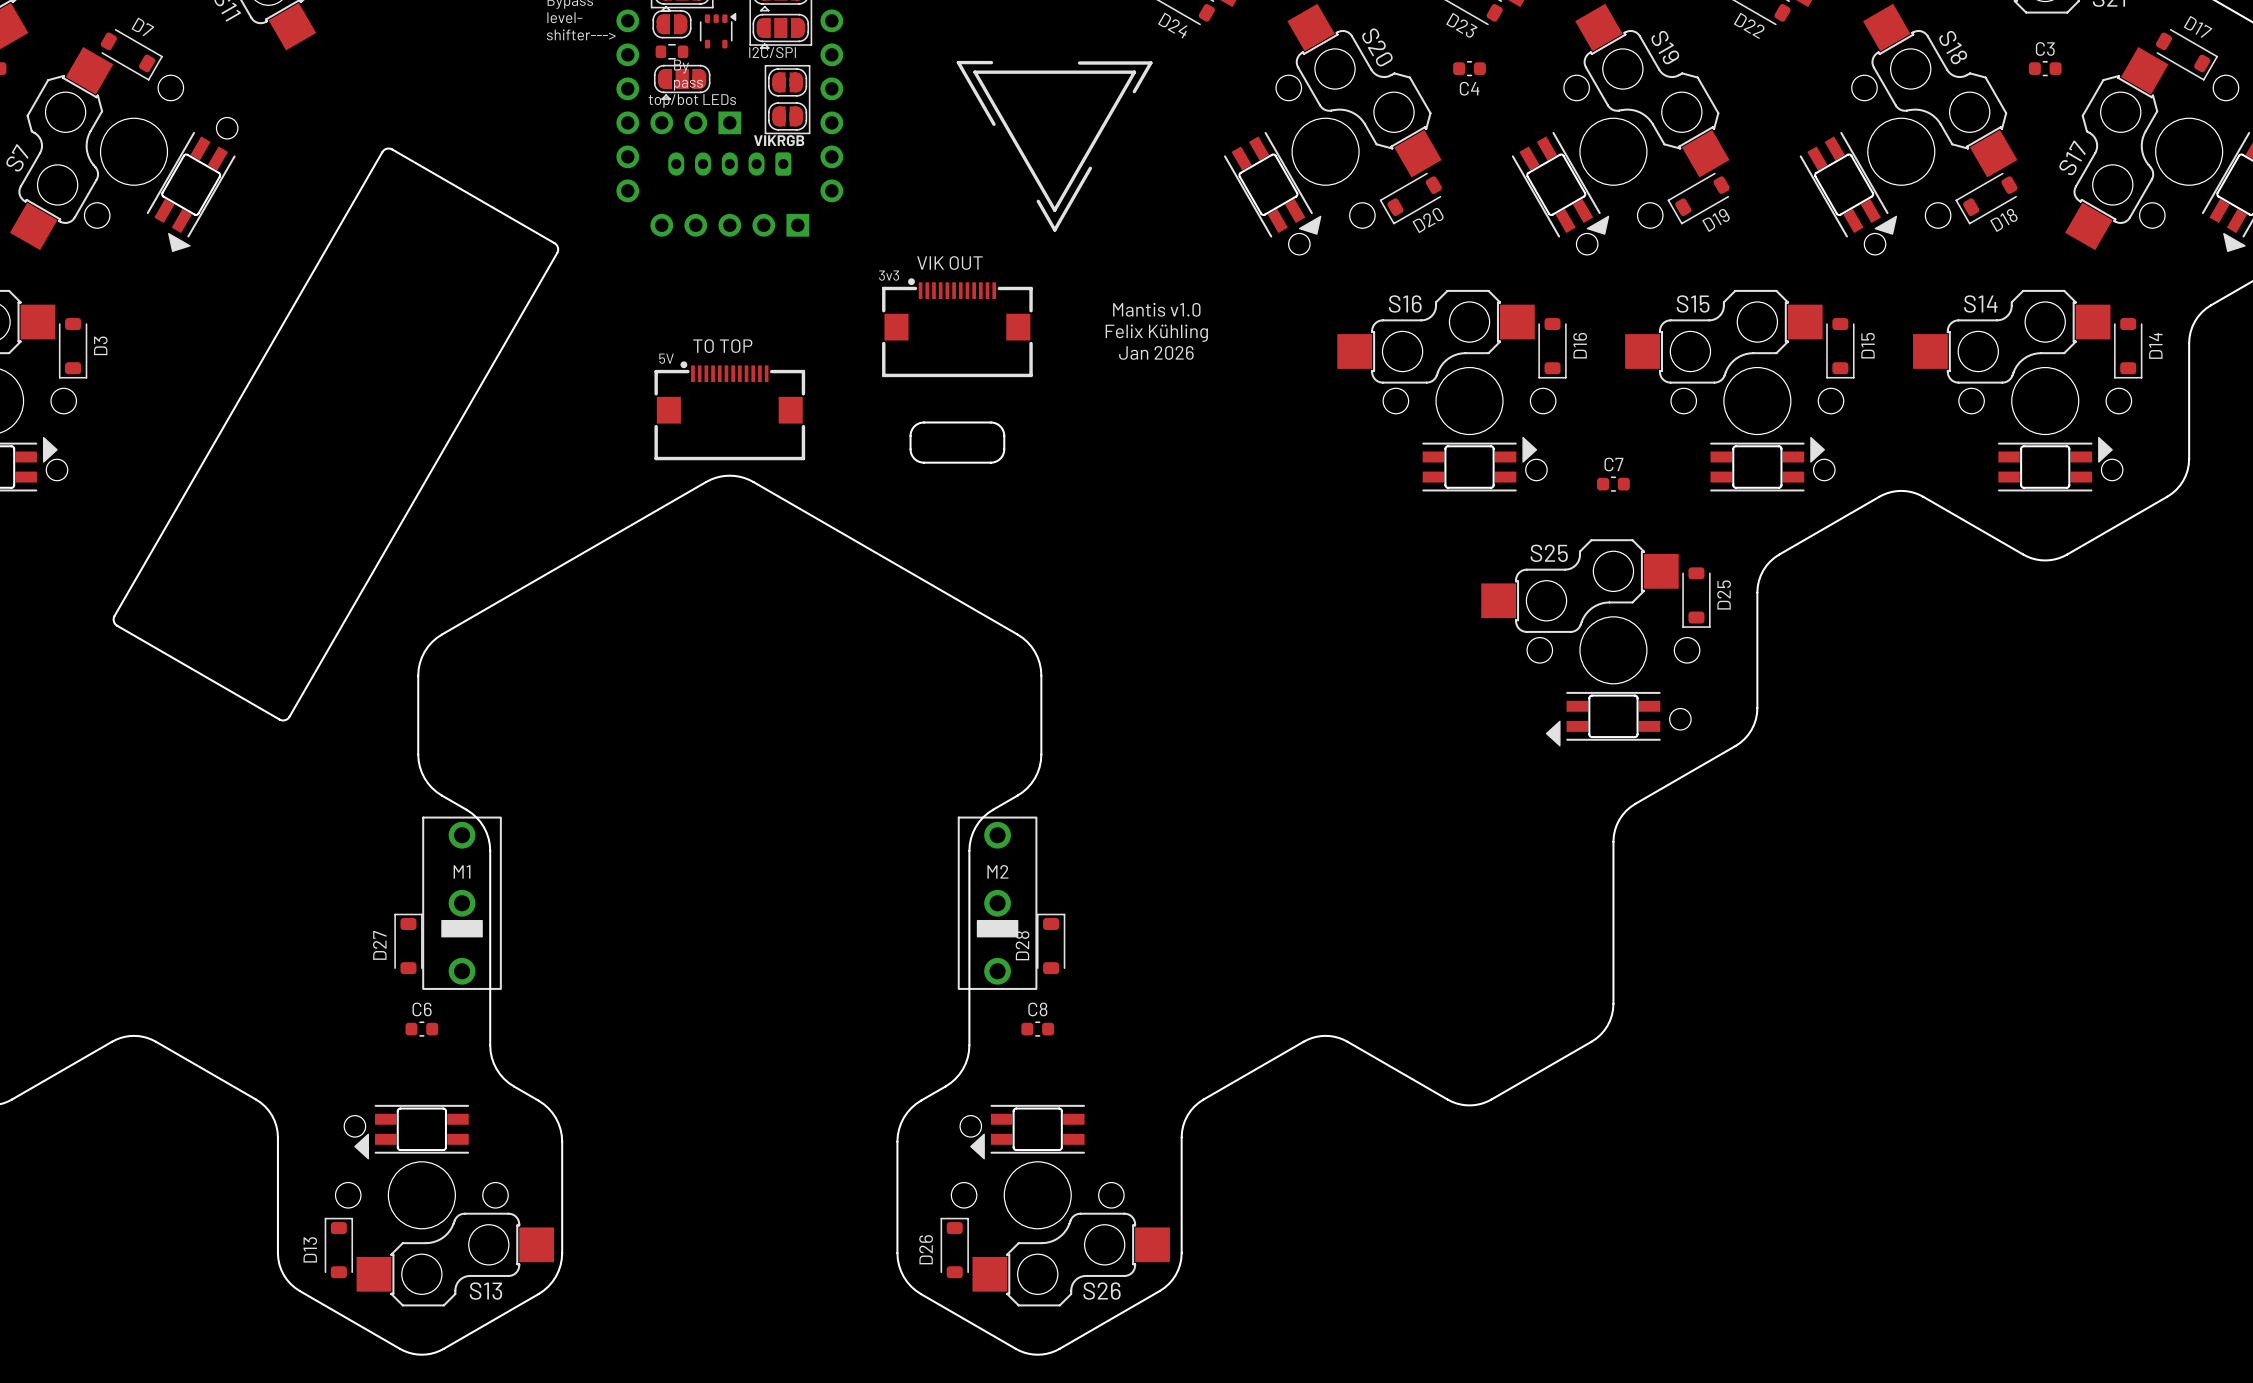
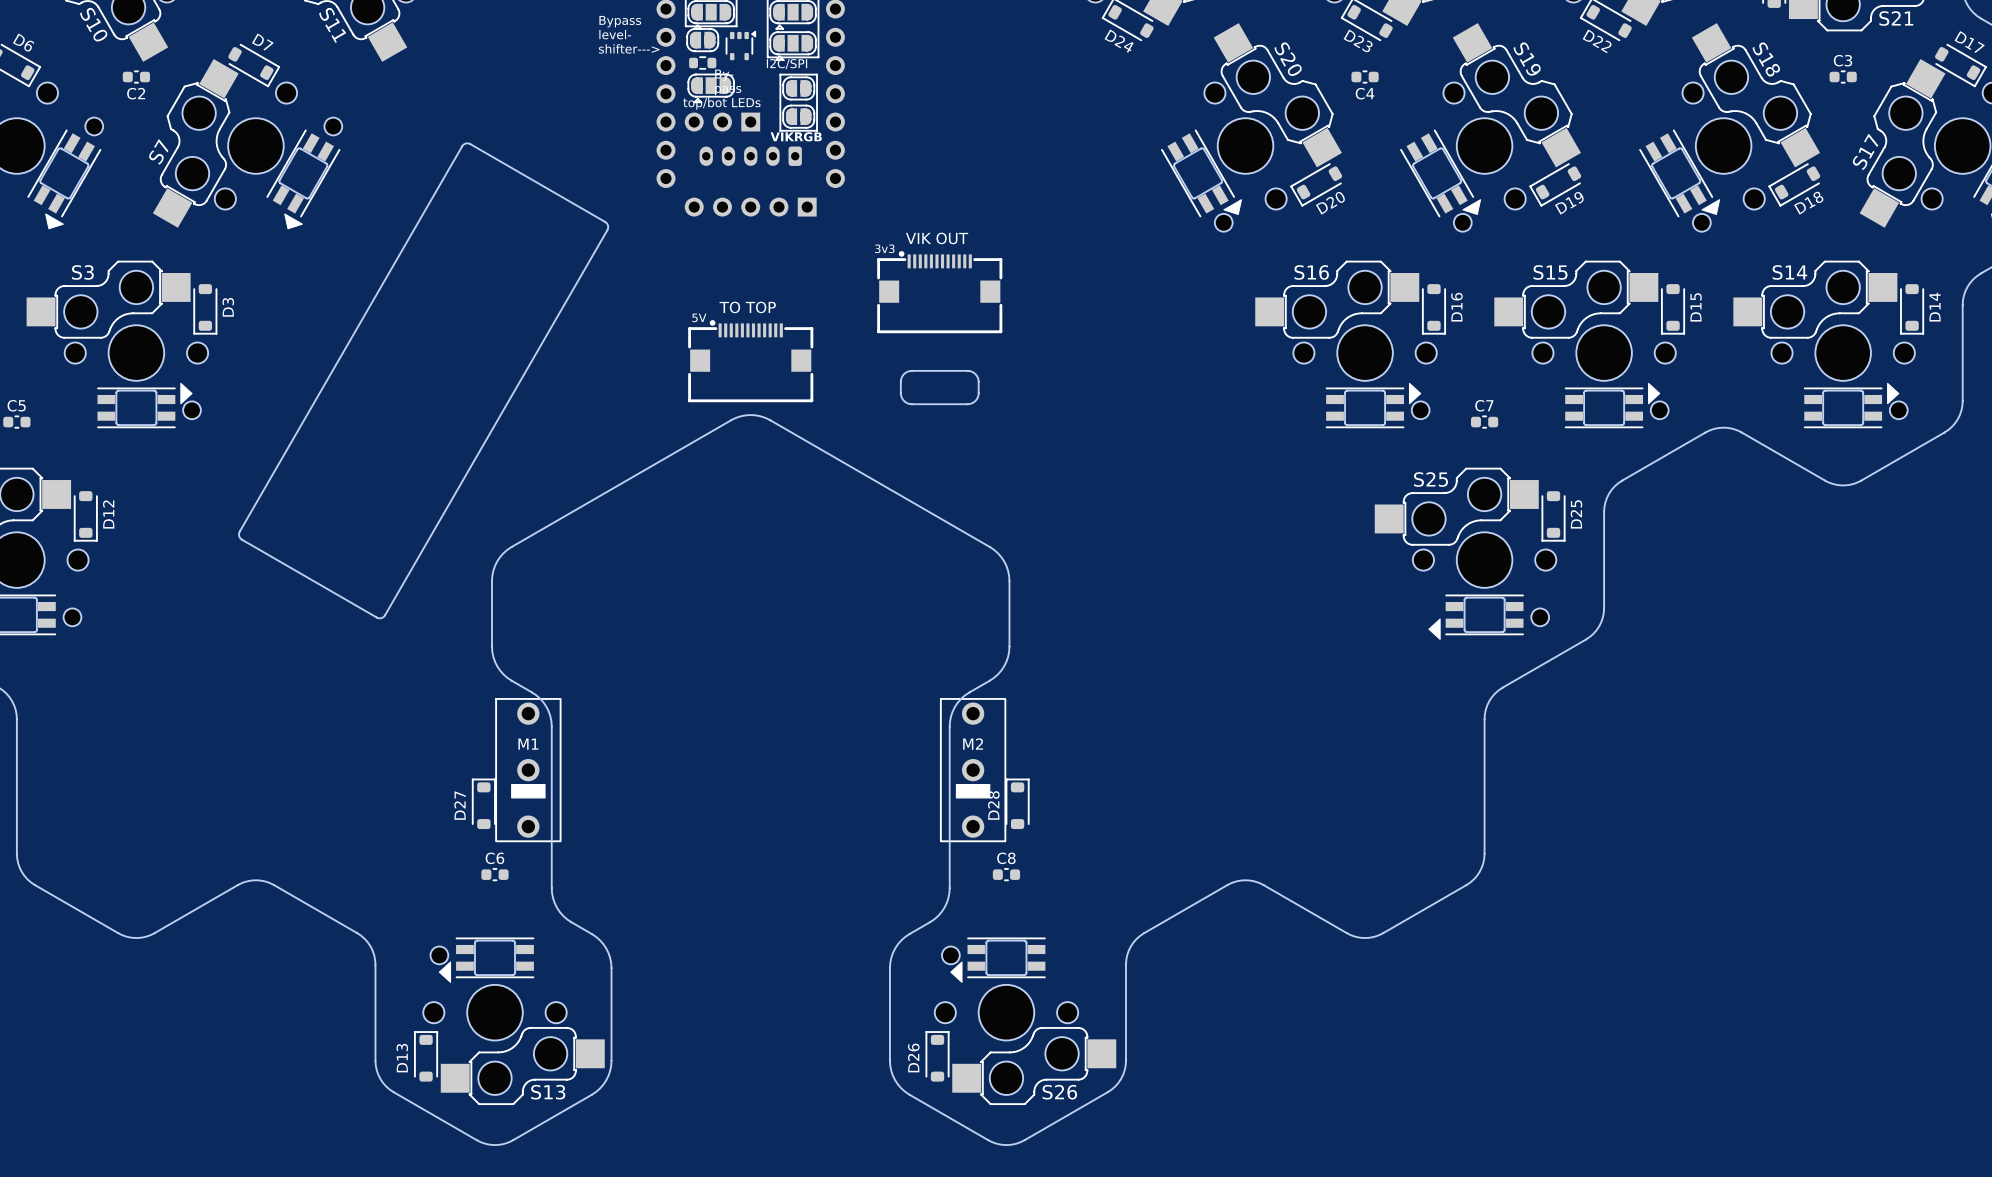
drawing: [956, 60, 1153, 232] -> none
text: Mantis v1.0 (1156, 309) -> none
text: Felix Kühling (1156, 333) -> none
text: Jan 2026 (1156, 352) -> none

